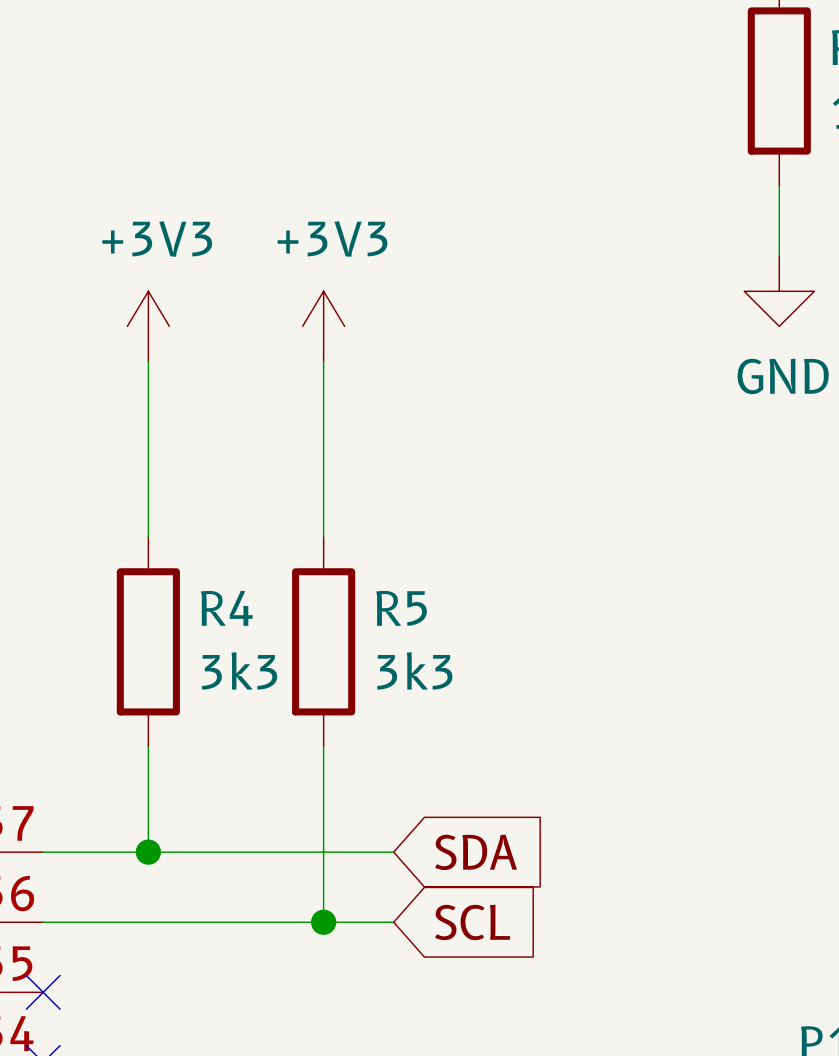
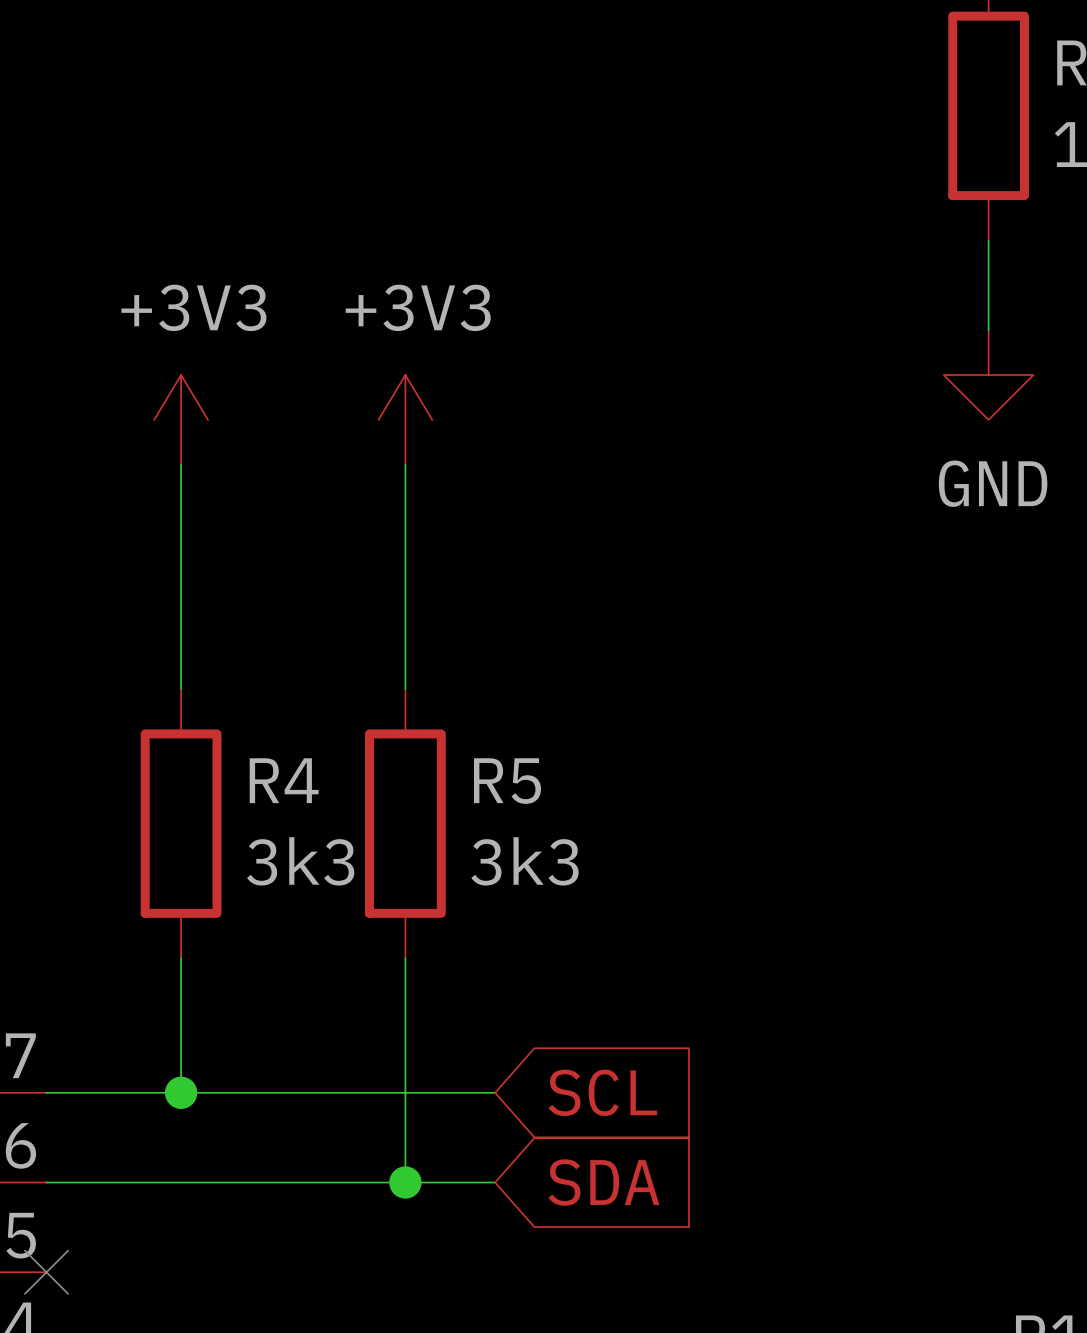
global label: SDA (476, 852) -> SCL (602, 1092)
global label: SCL (472, 922) -> SDA (603, 1182)

